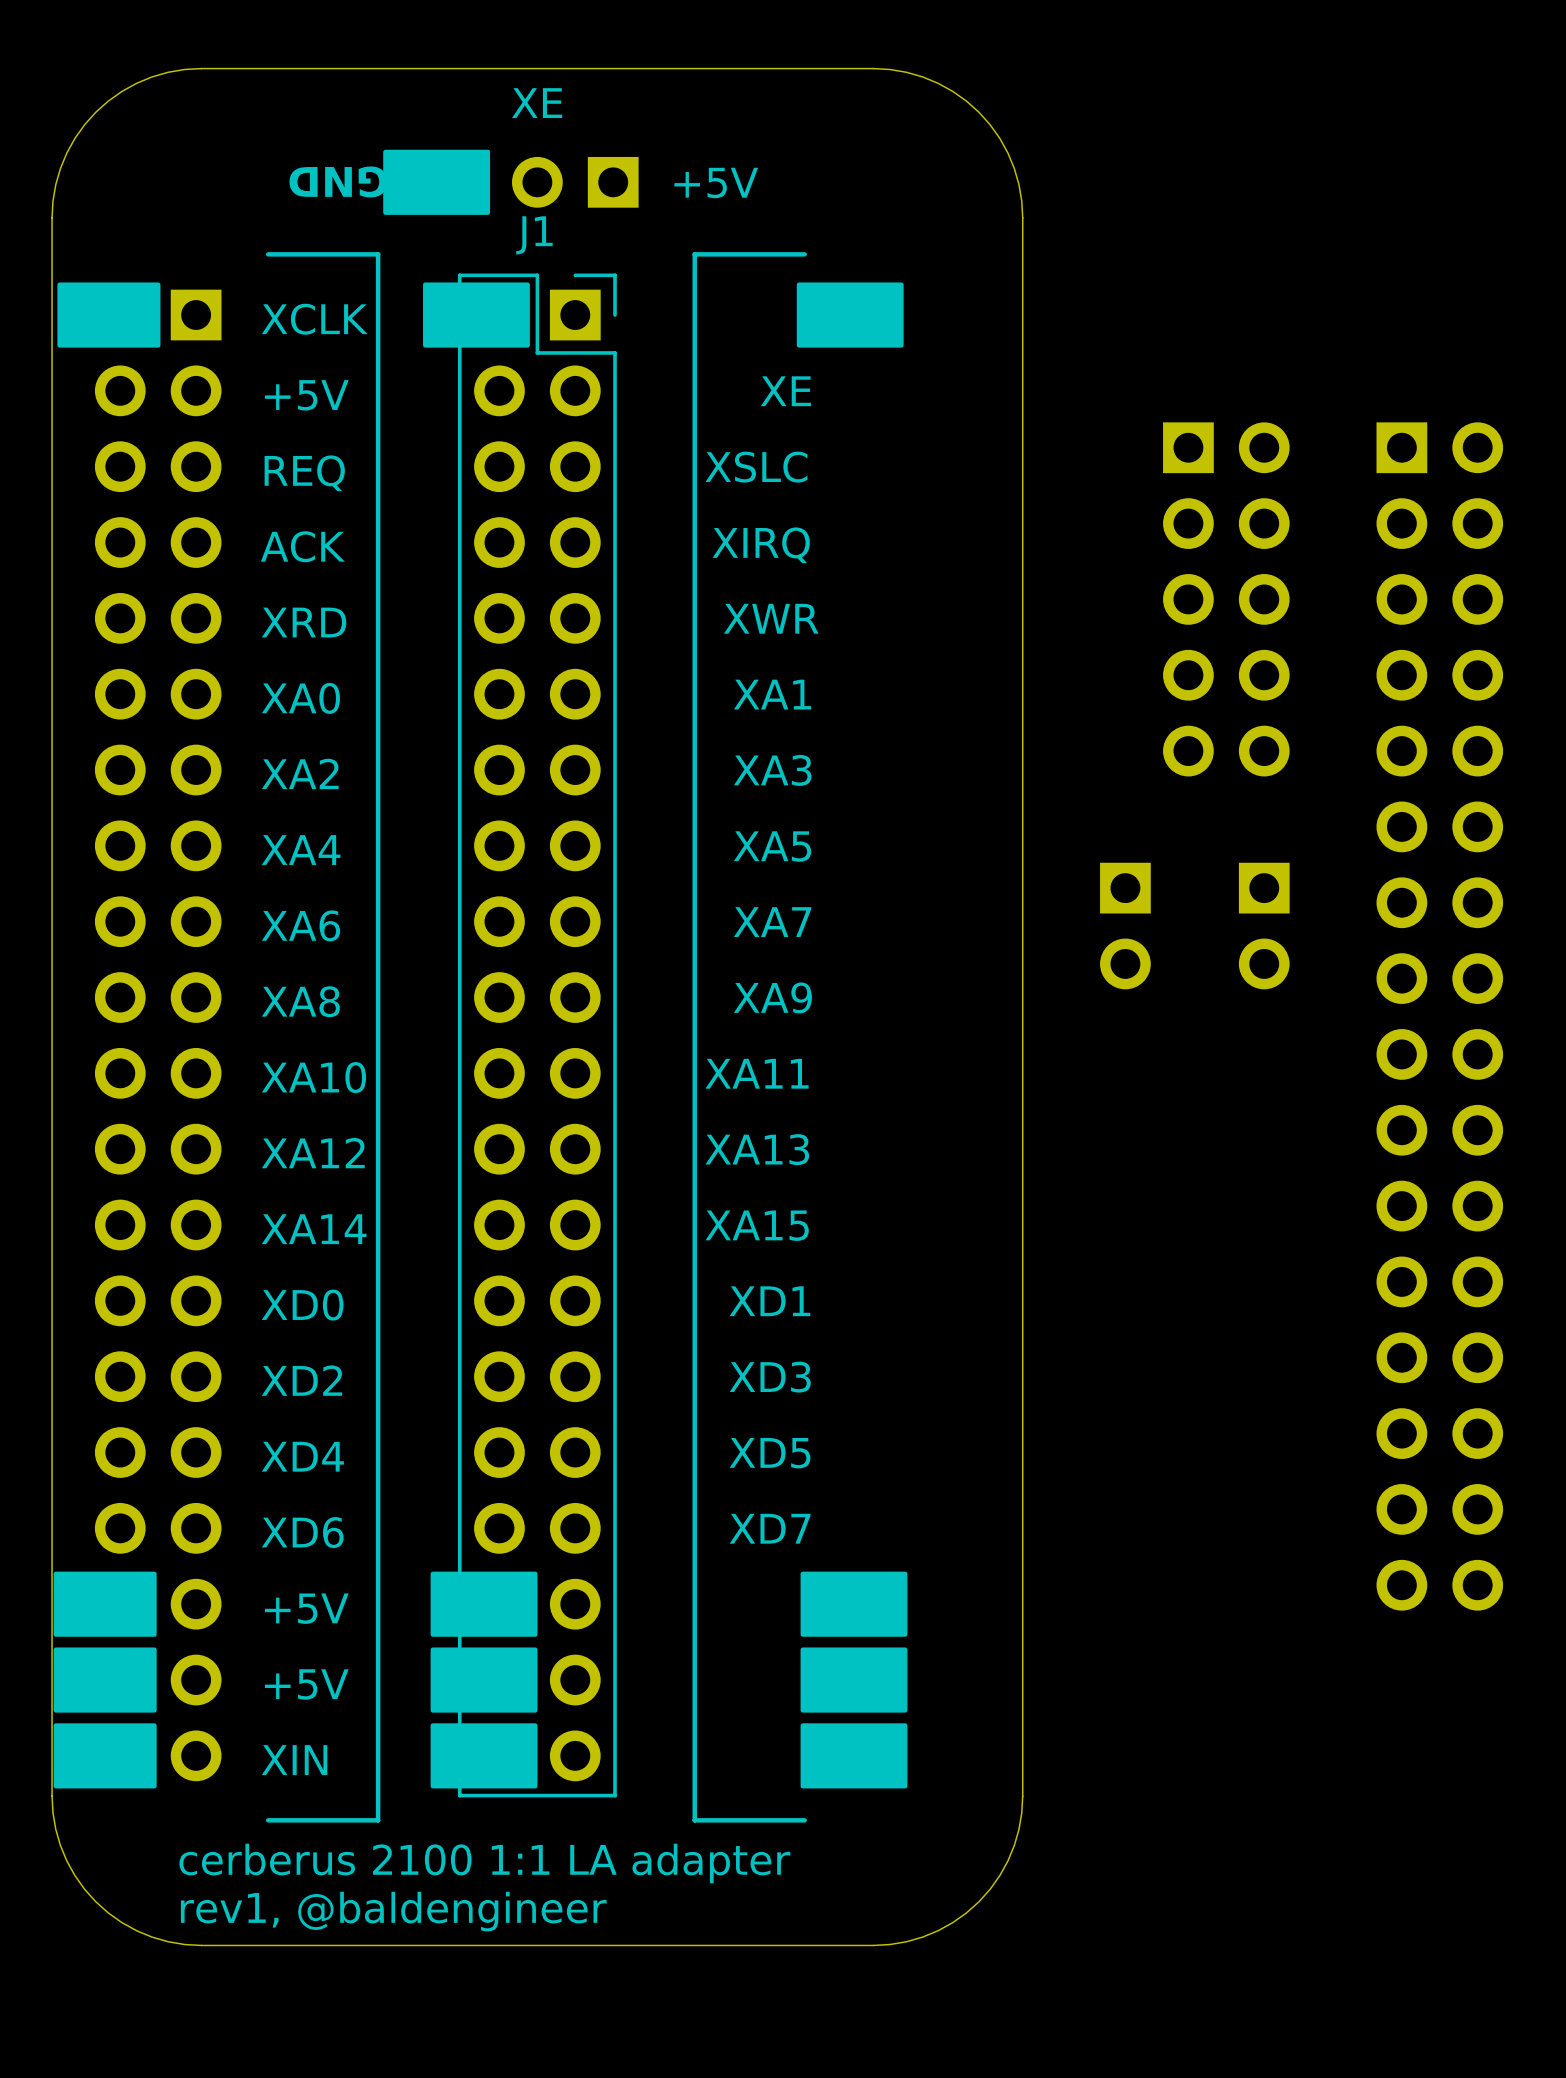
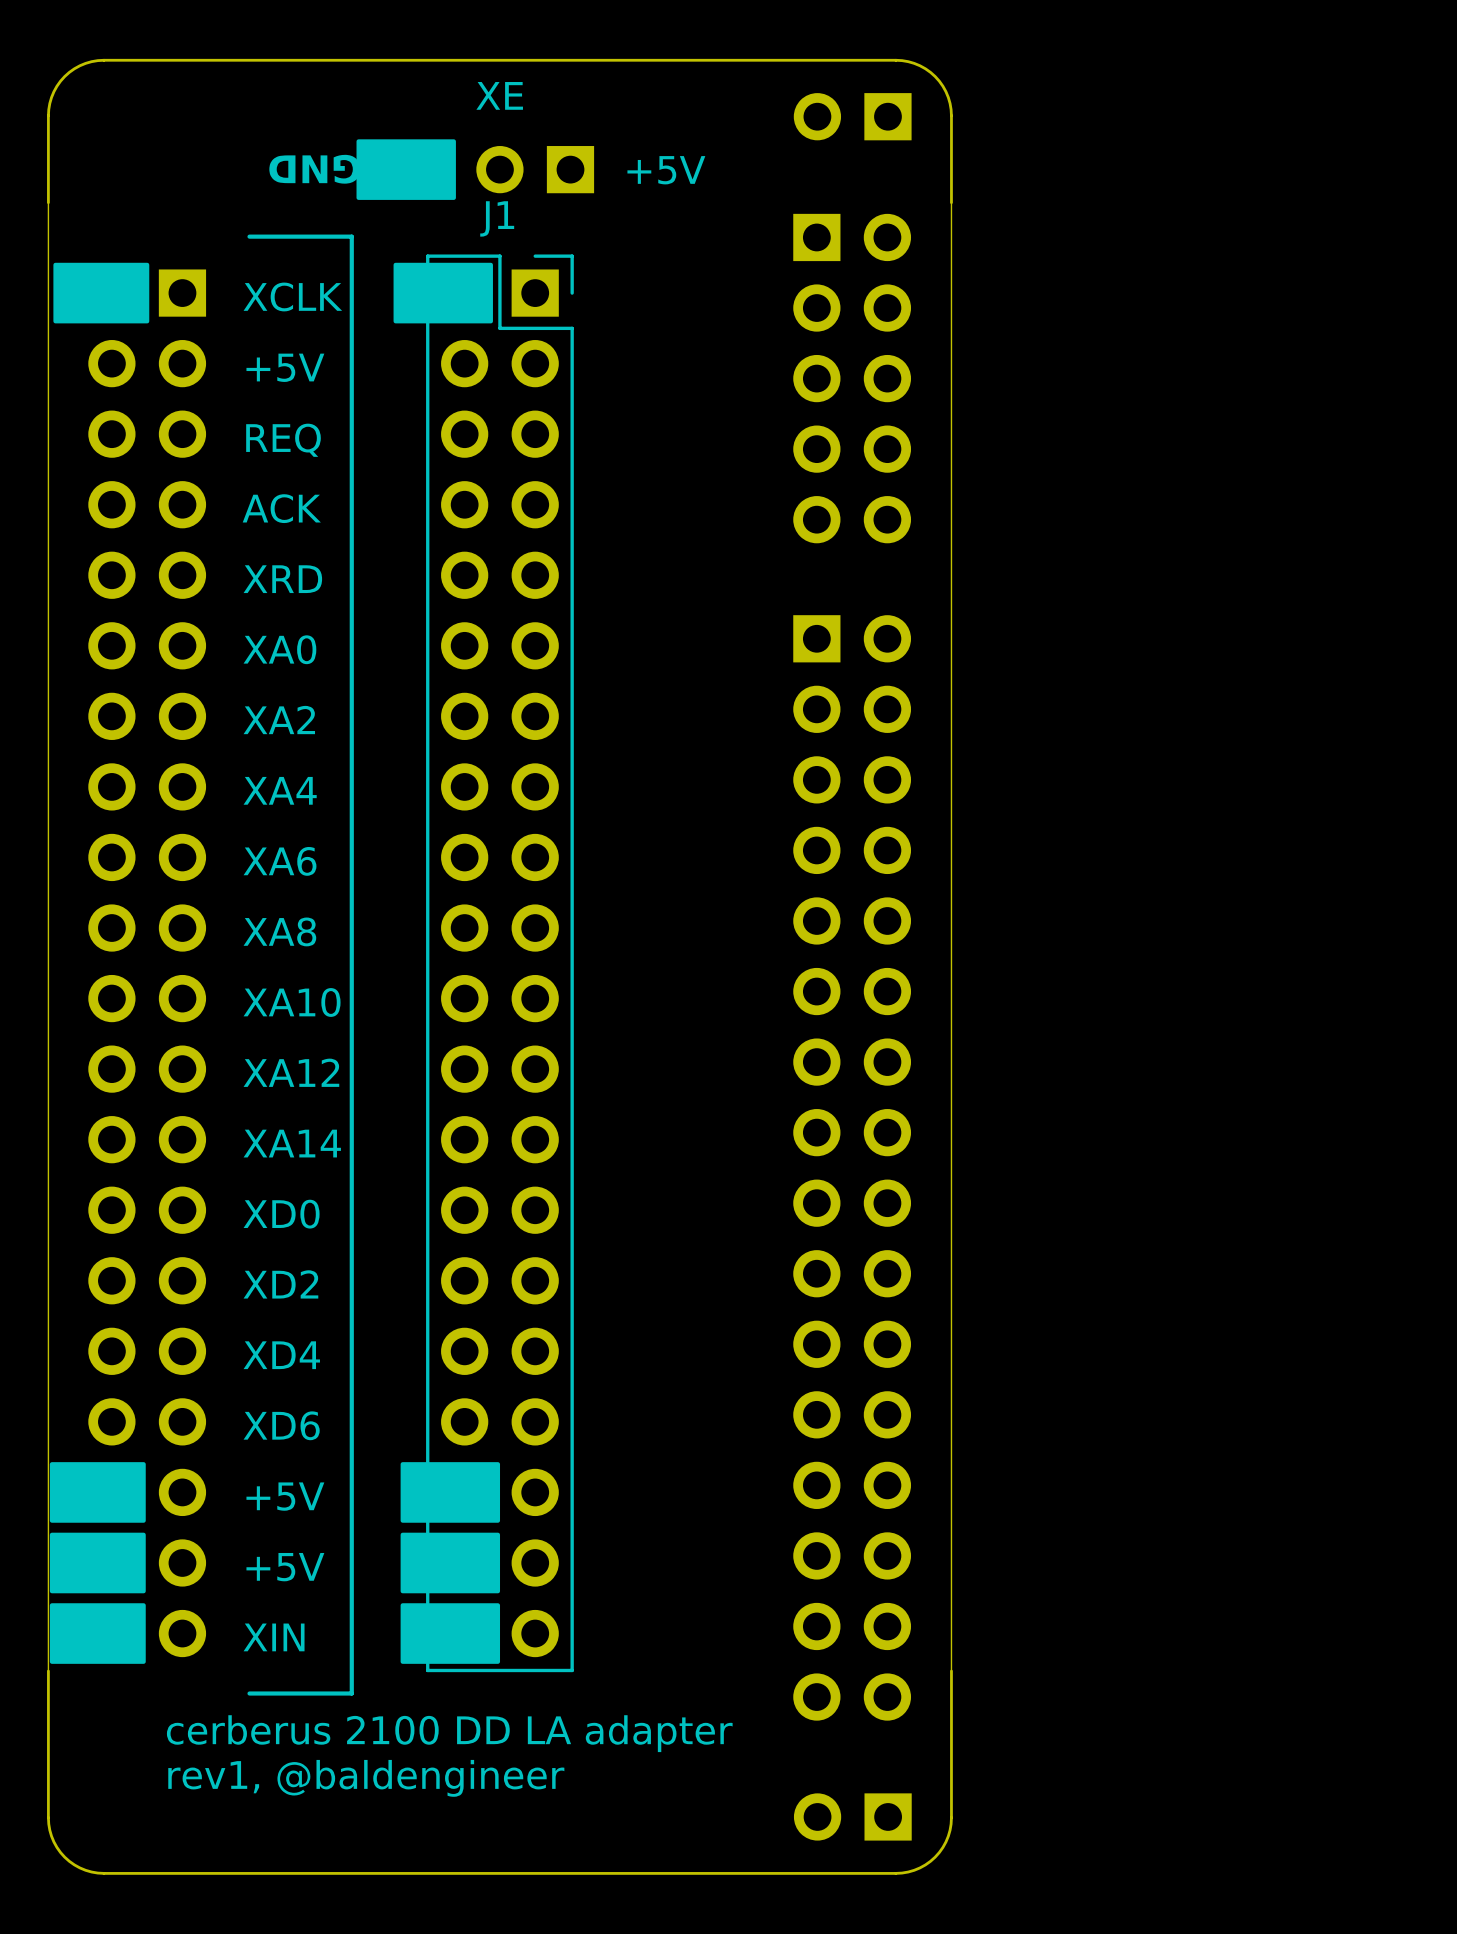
part: none -> (852, 116)
board edge: (1022, 217) (1018, 184) (1014, 168) (999, 138) (978, 112) (952, 91) (922, 76) (890, 69) (873, 68) (201, 68) (168, 72) (136, 83) (121, 91) (95, 112) (84, 124) (66, 153) (60, 168) (55, 184) (52, 217) -> (951, 202) (951, 115) (948, 97) (939, 81) (925, 68) (908, 61) (895, 60) (97, 60) (79, 65) (69, 72) (60, 81) (51, 97) (48, 115) (48, 202)
line: (804, 254) (694, 254) (694, 1820) (804, 1820) -> none
drawing: [796, 282, 904, 348] -> none
text: XE (785, 391) -> none
text: XSLC (756, 467) -> none
text: XIRQ (761, 545) -> none
part position: (1226, 599) -> (852, 378)
text: XWR (771, 618) -> none
text: XA1 (772, 694) -> none
text: XA3 (772, 770) -> none
text: XA5 (772, 846) -> none
text: XA7 (772, 922) -> none
part: (1125, 926) -> none
part: (1264, 926) -> none
text: XA9 (772, 997) -> none
part position: (1439, 1016) -> (852, 1167)
text: XA11 (757, 1073) -> none
text: XA13 (757, 1149) -> none
text: XA15 (757, 1225) -> none
text: XD1 (769, 1301) -> none
text: XD3 (770, 1377) -> none
text: XD5 (770, 1453) -> none
text: XD7 (770, 1528) -> none
drawing: [800, 1571, 908, 1789] -> none
board edge: (1022, 1796) (1018, 1829) (1007, 1860) (990, 1889) (978, 1901) (952, 1922) (938, 1930) (906, 1941) (873, 1945) (201, 1945) (168, 1941) (136, 1930) (121, 1922) (108, 1912) (84, 1889) (74, 1875) (60, 1845) (52, 1812) (52, 1796) -> (951, 1671) (950, 1830) (942, 1847) (930, 1861) (914, 1870) (895, 1873) (91, 1872) (74, 1864) (64, 1857) (56, 1847) (49, 1830) (48, 1671)
text: cerberus 2100 1:1 LA adapter (484, 1863) -> cerberus 2100 DD LA adapter (449, 1733)
part: none -> (852, 1816)

